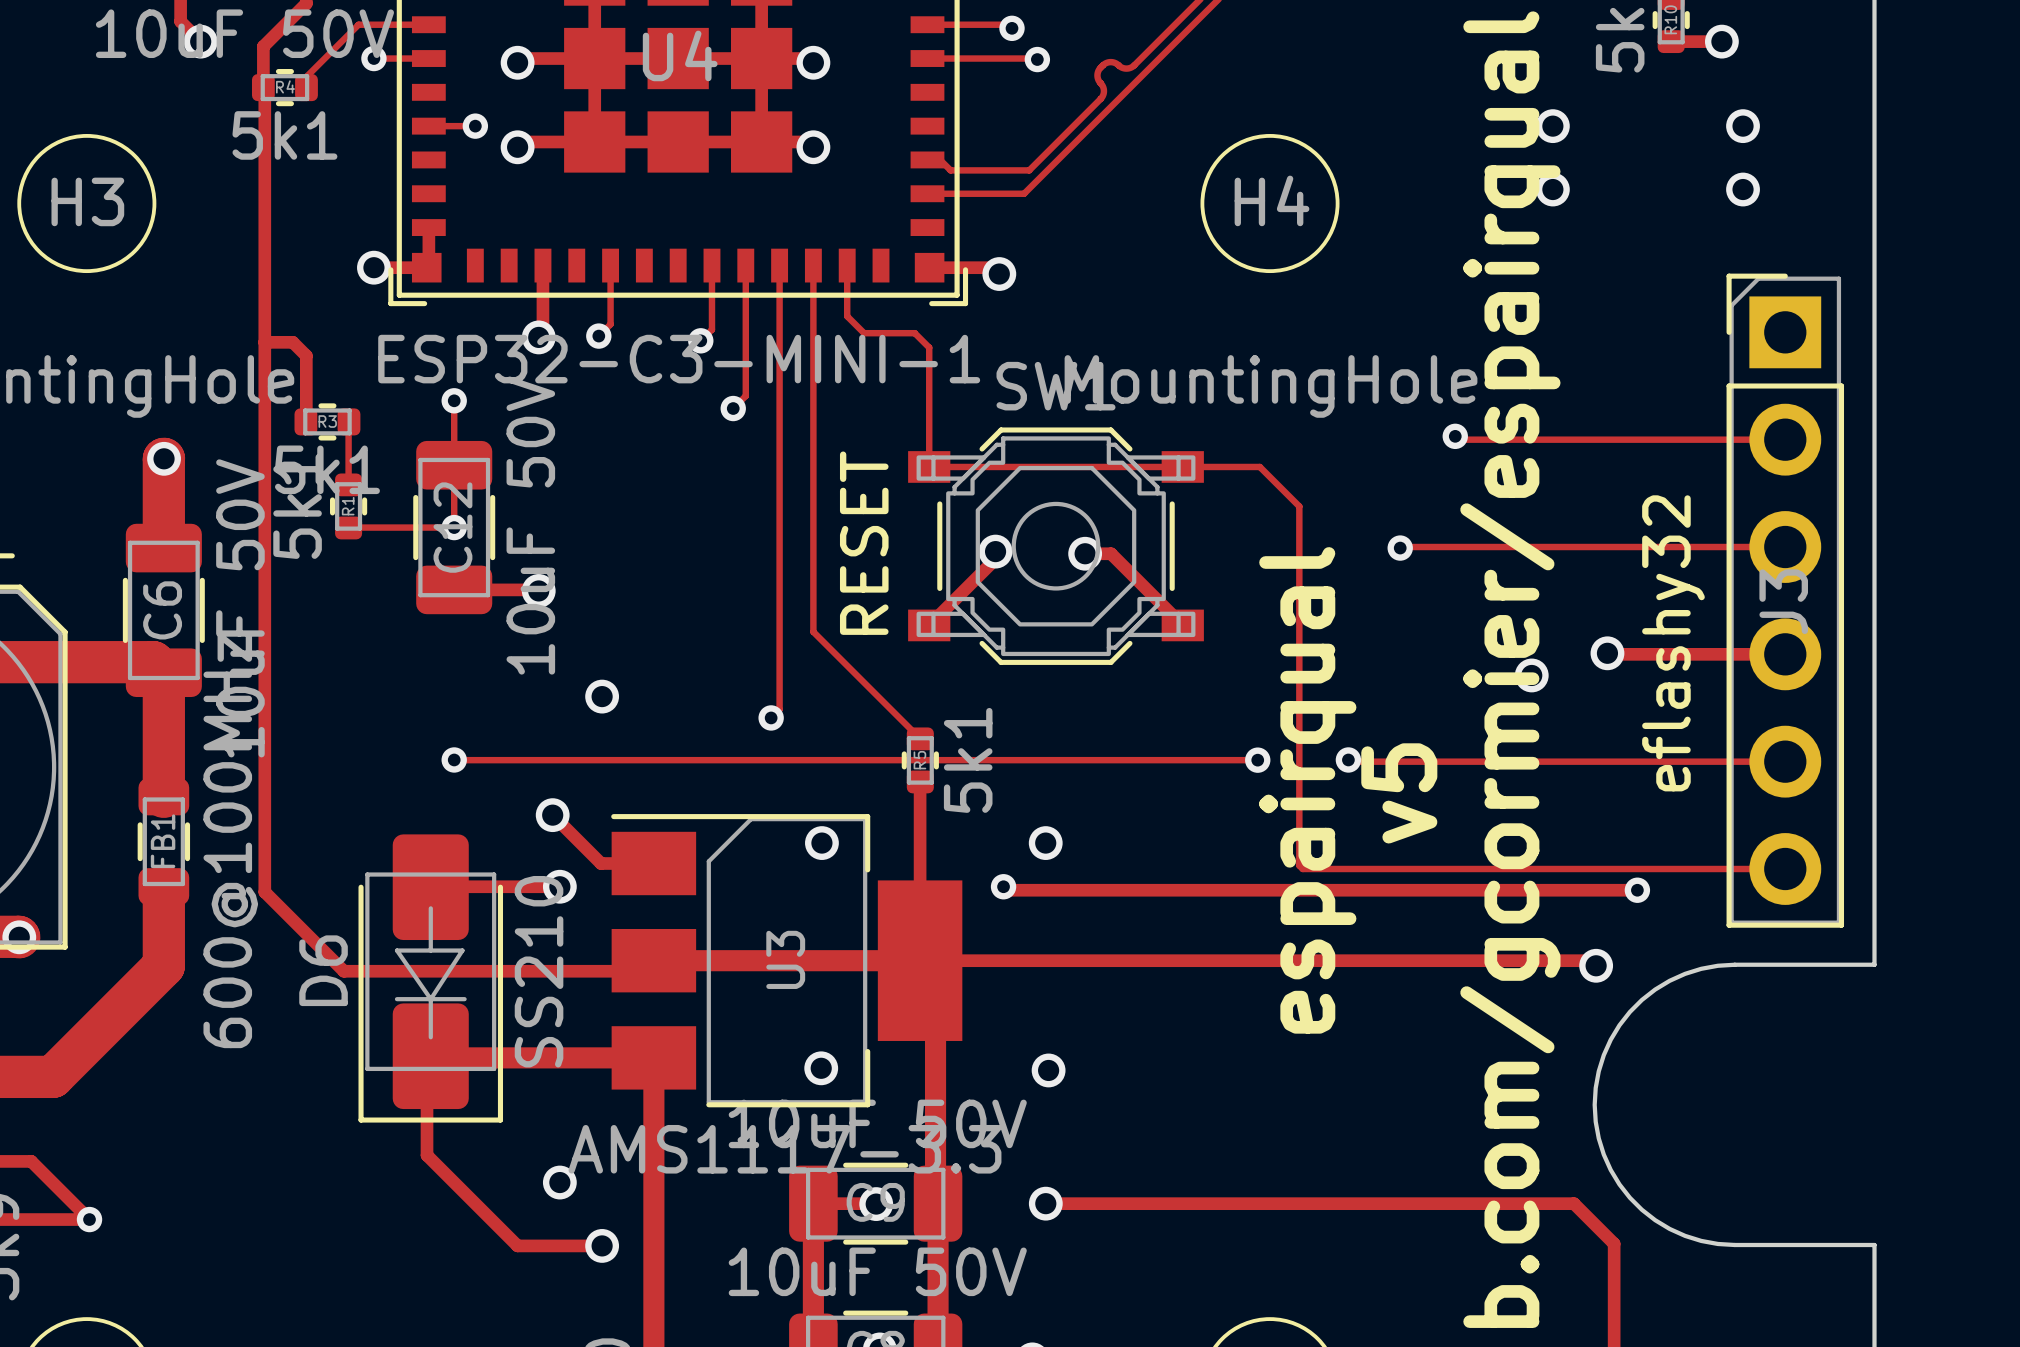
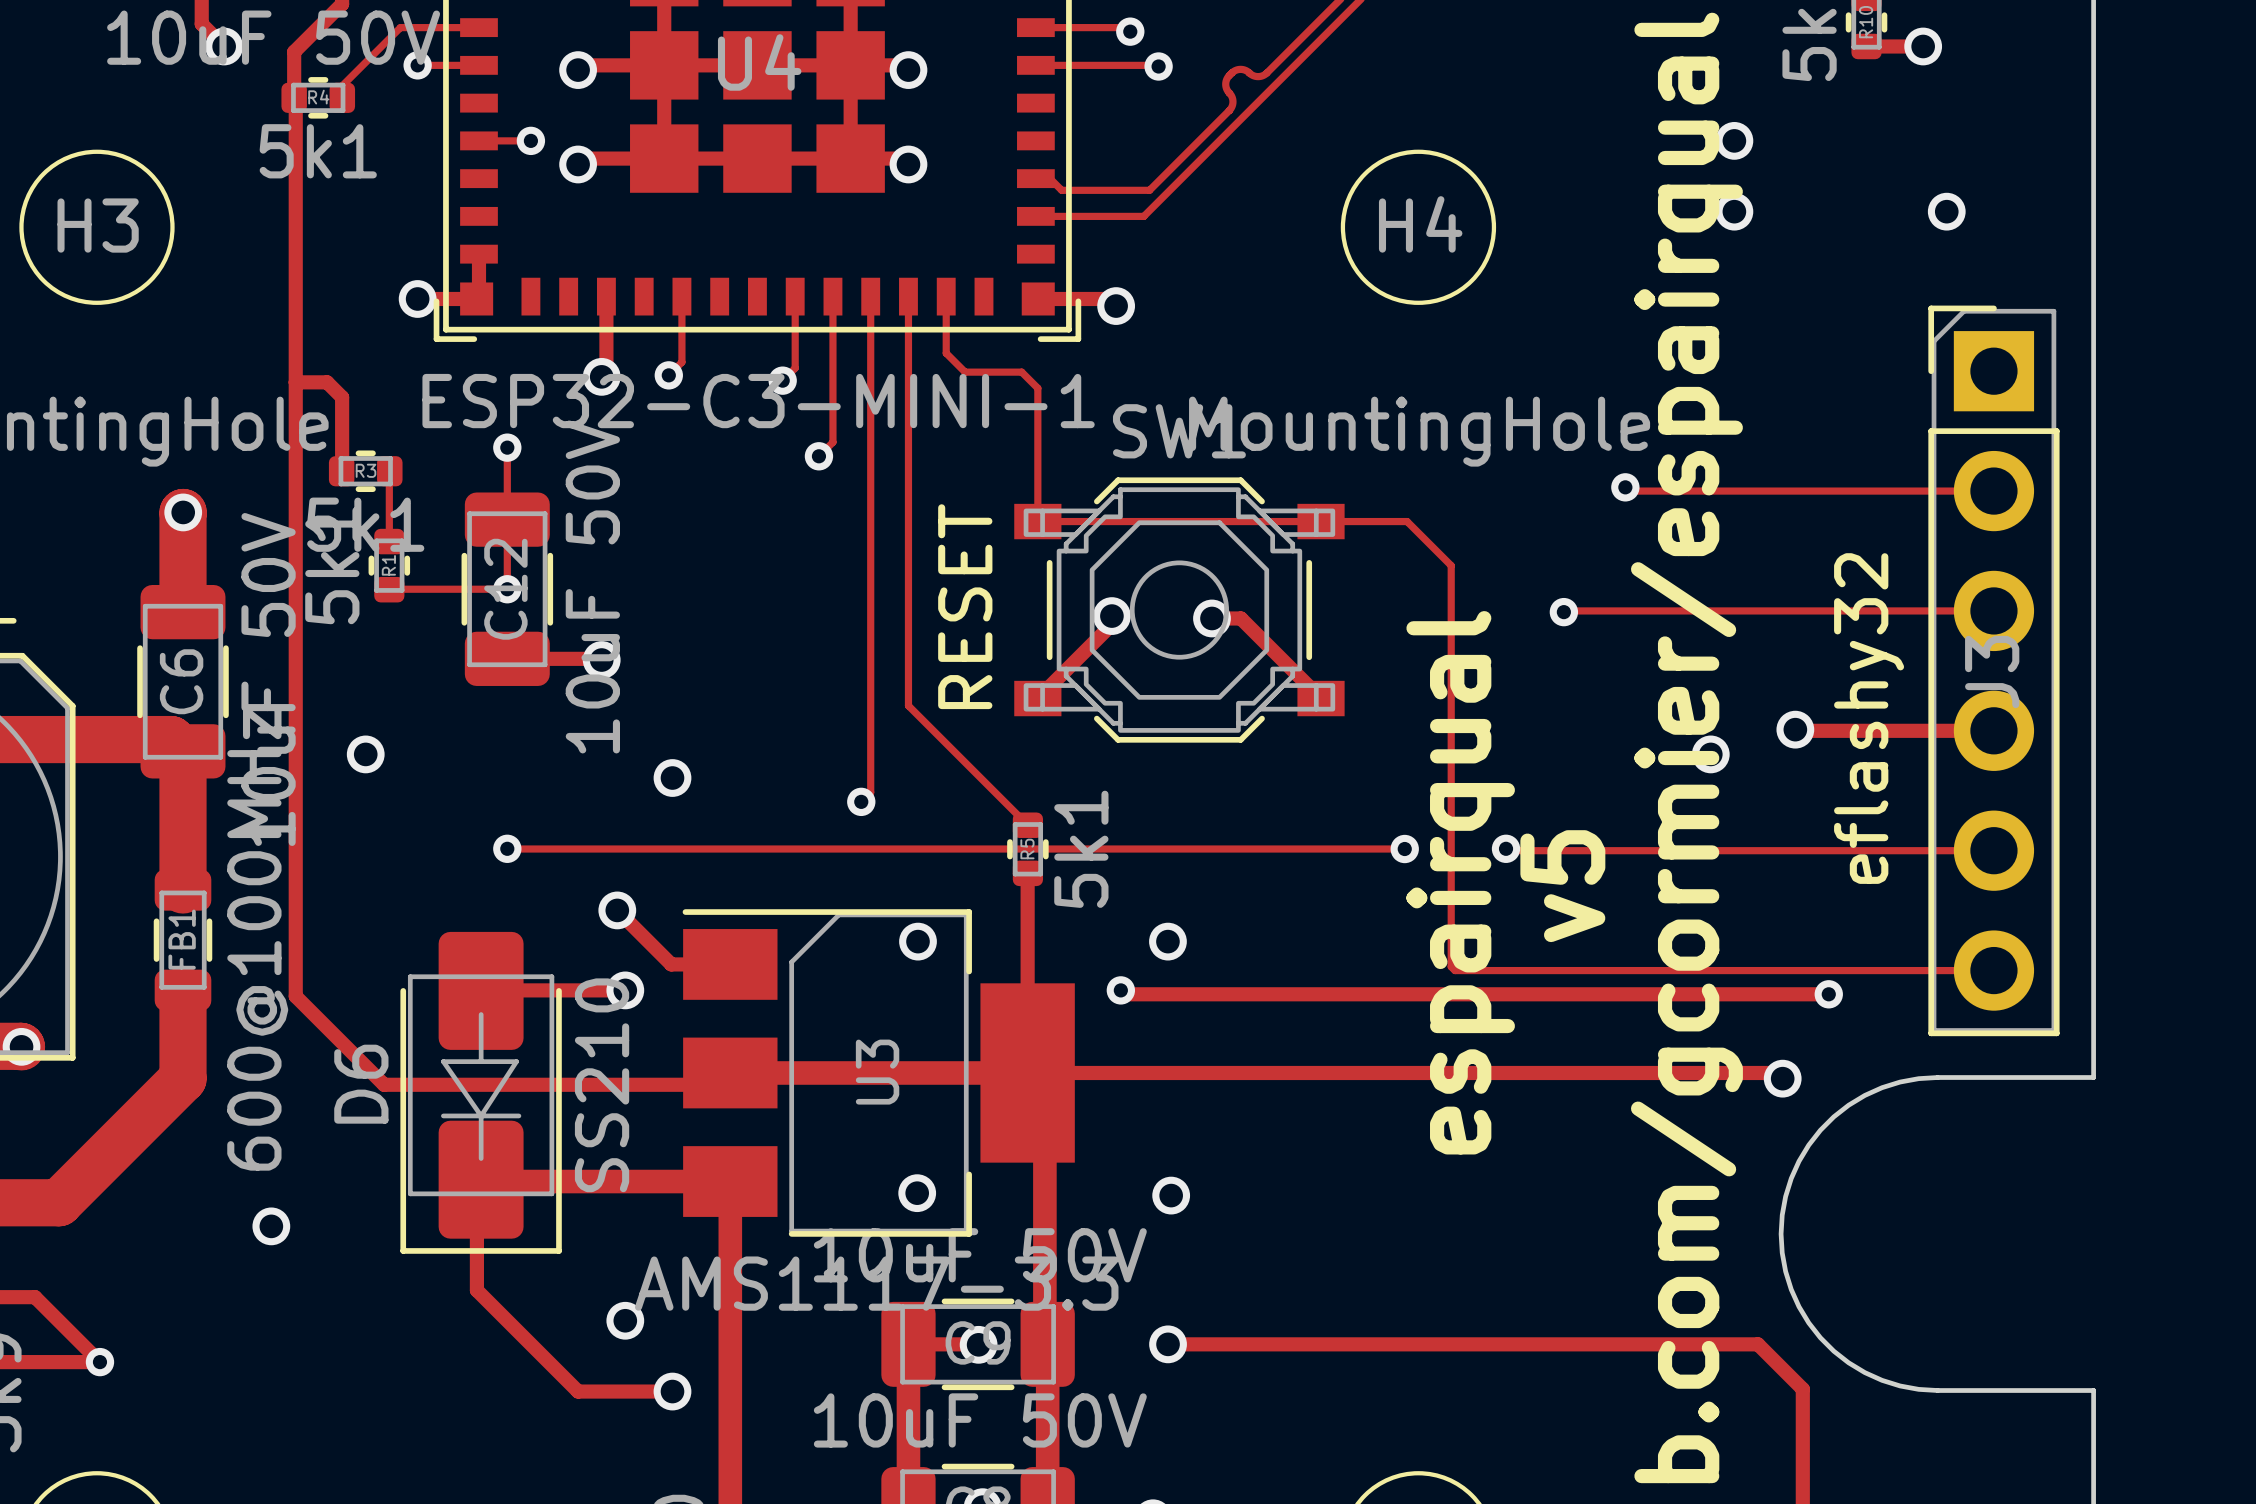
via: (1743, 126) -> none
via: none -> (365, 754)
via: none -> (271, 1226)

